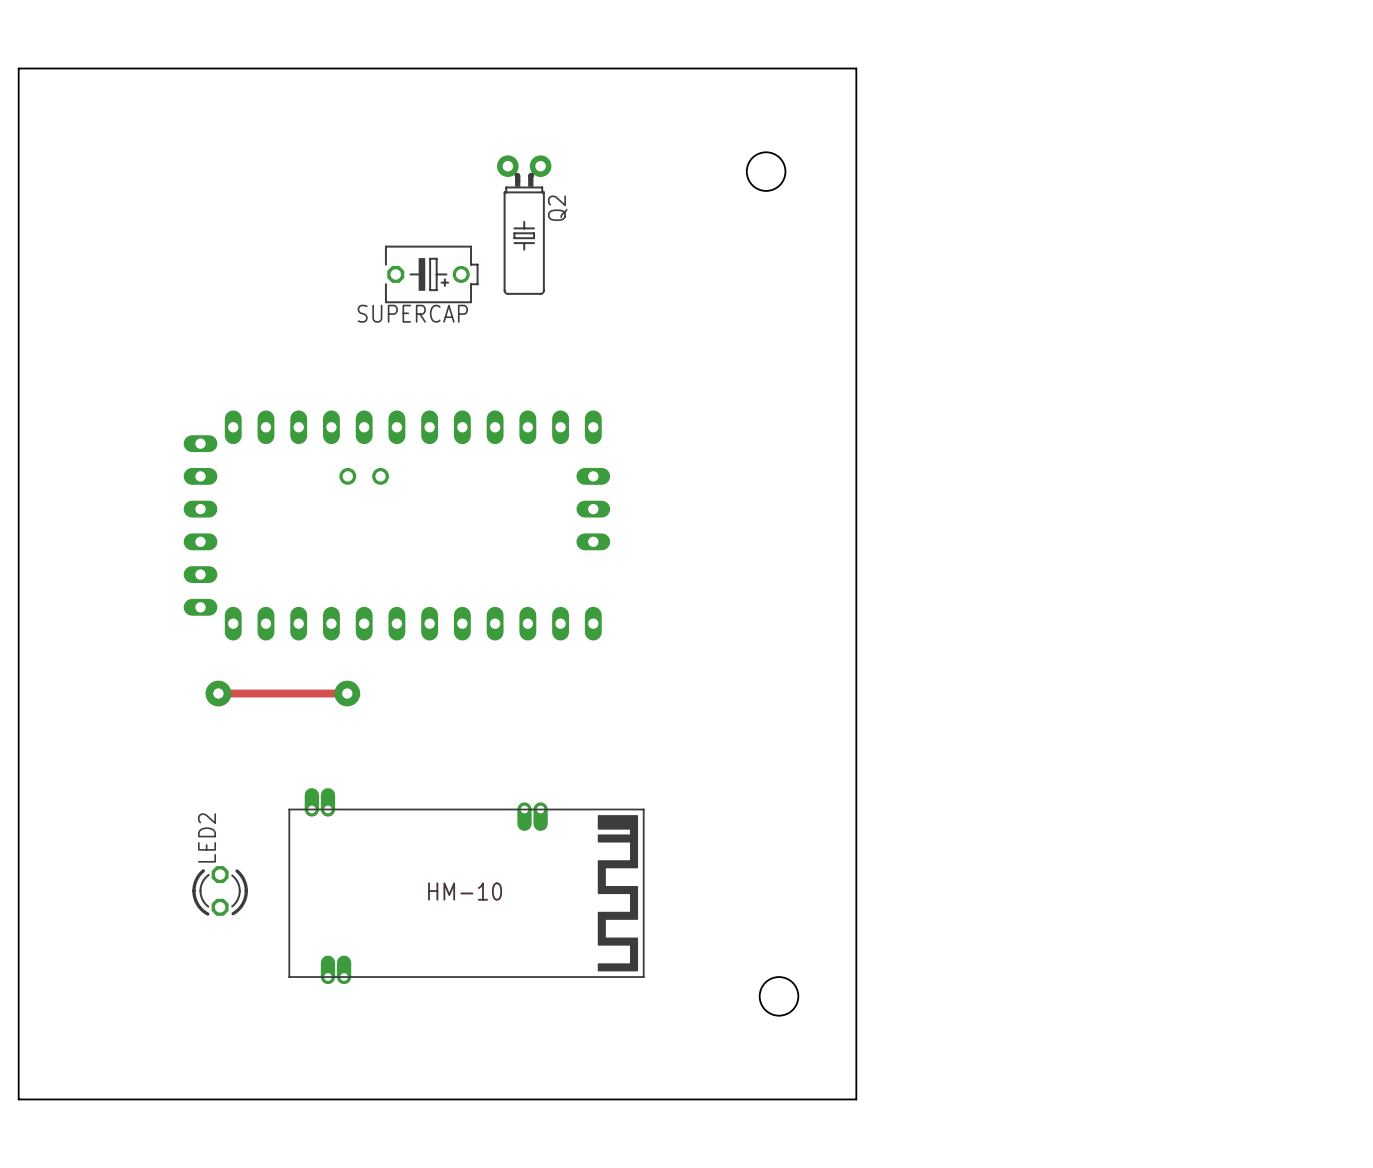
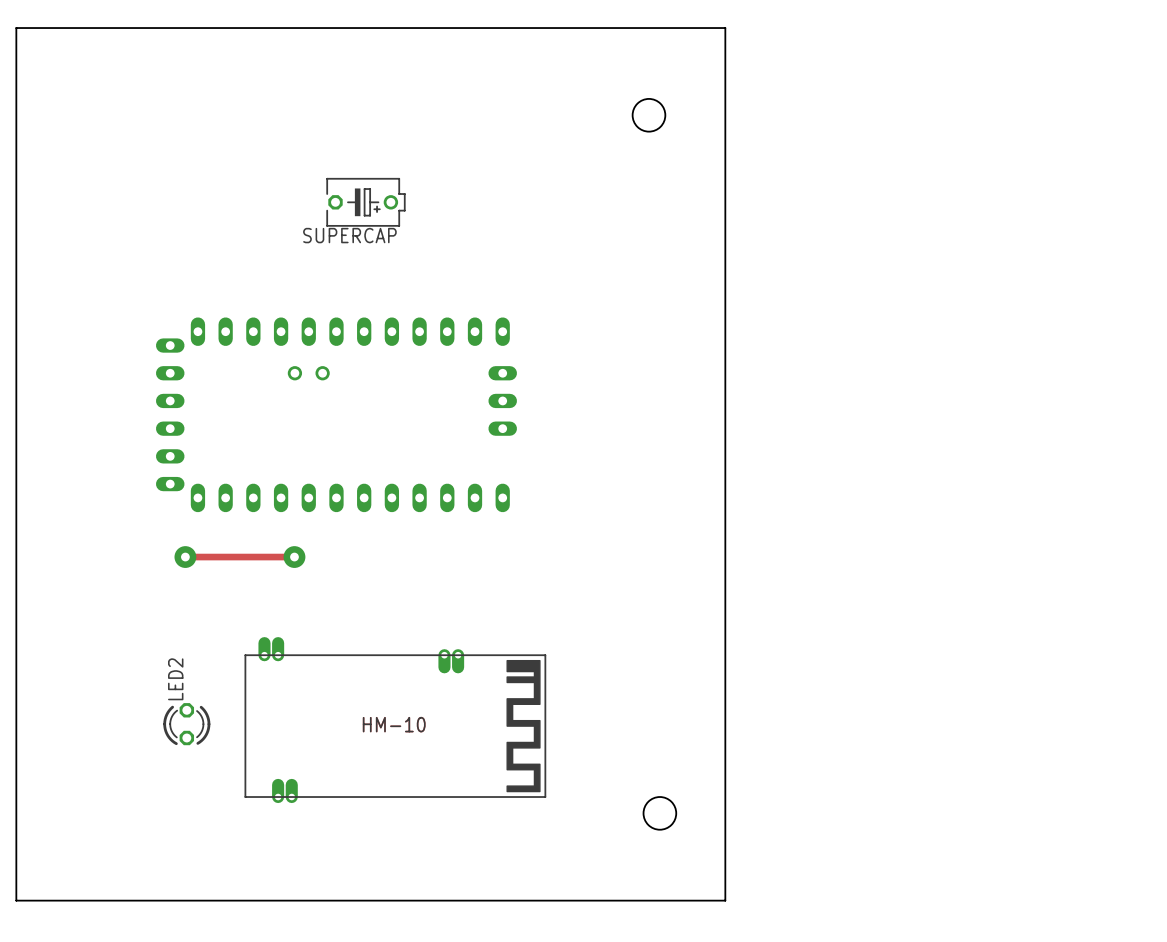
Q2: (524, 225) -> none

